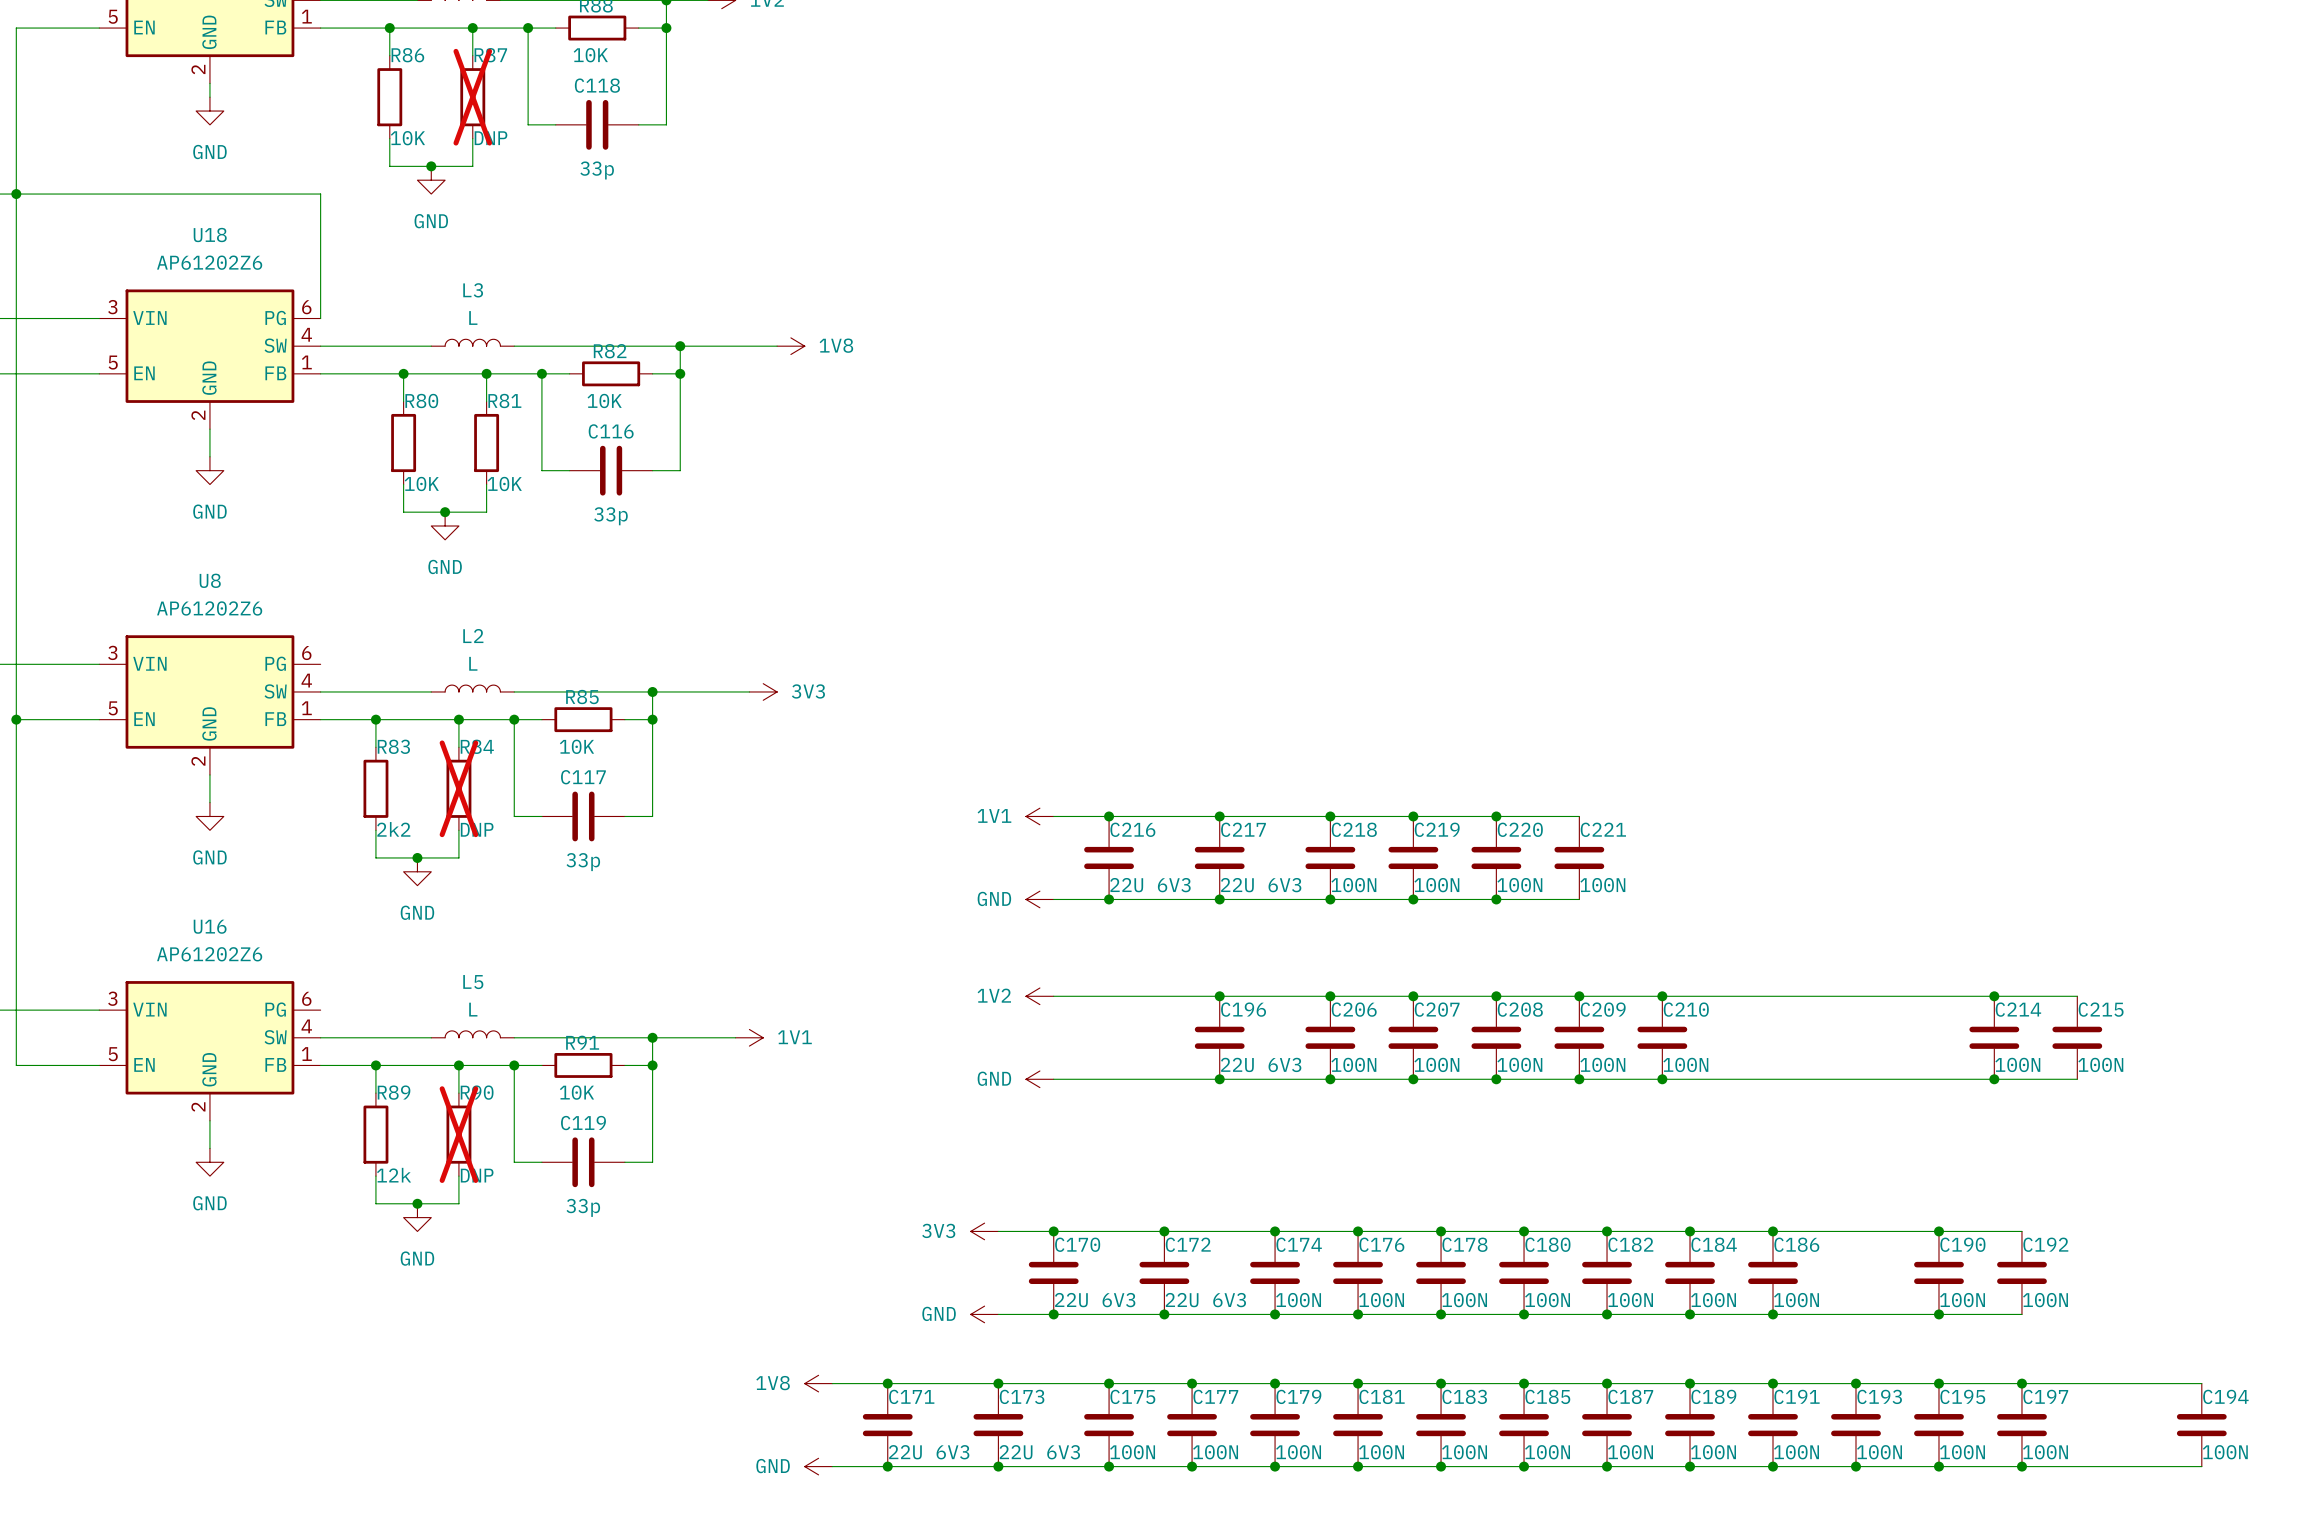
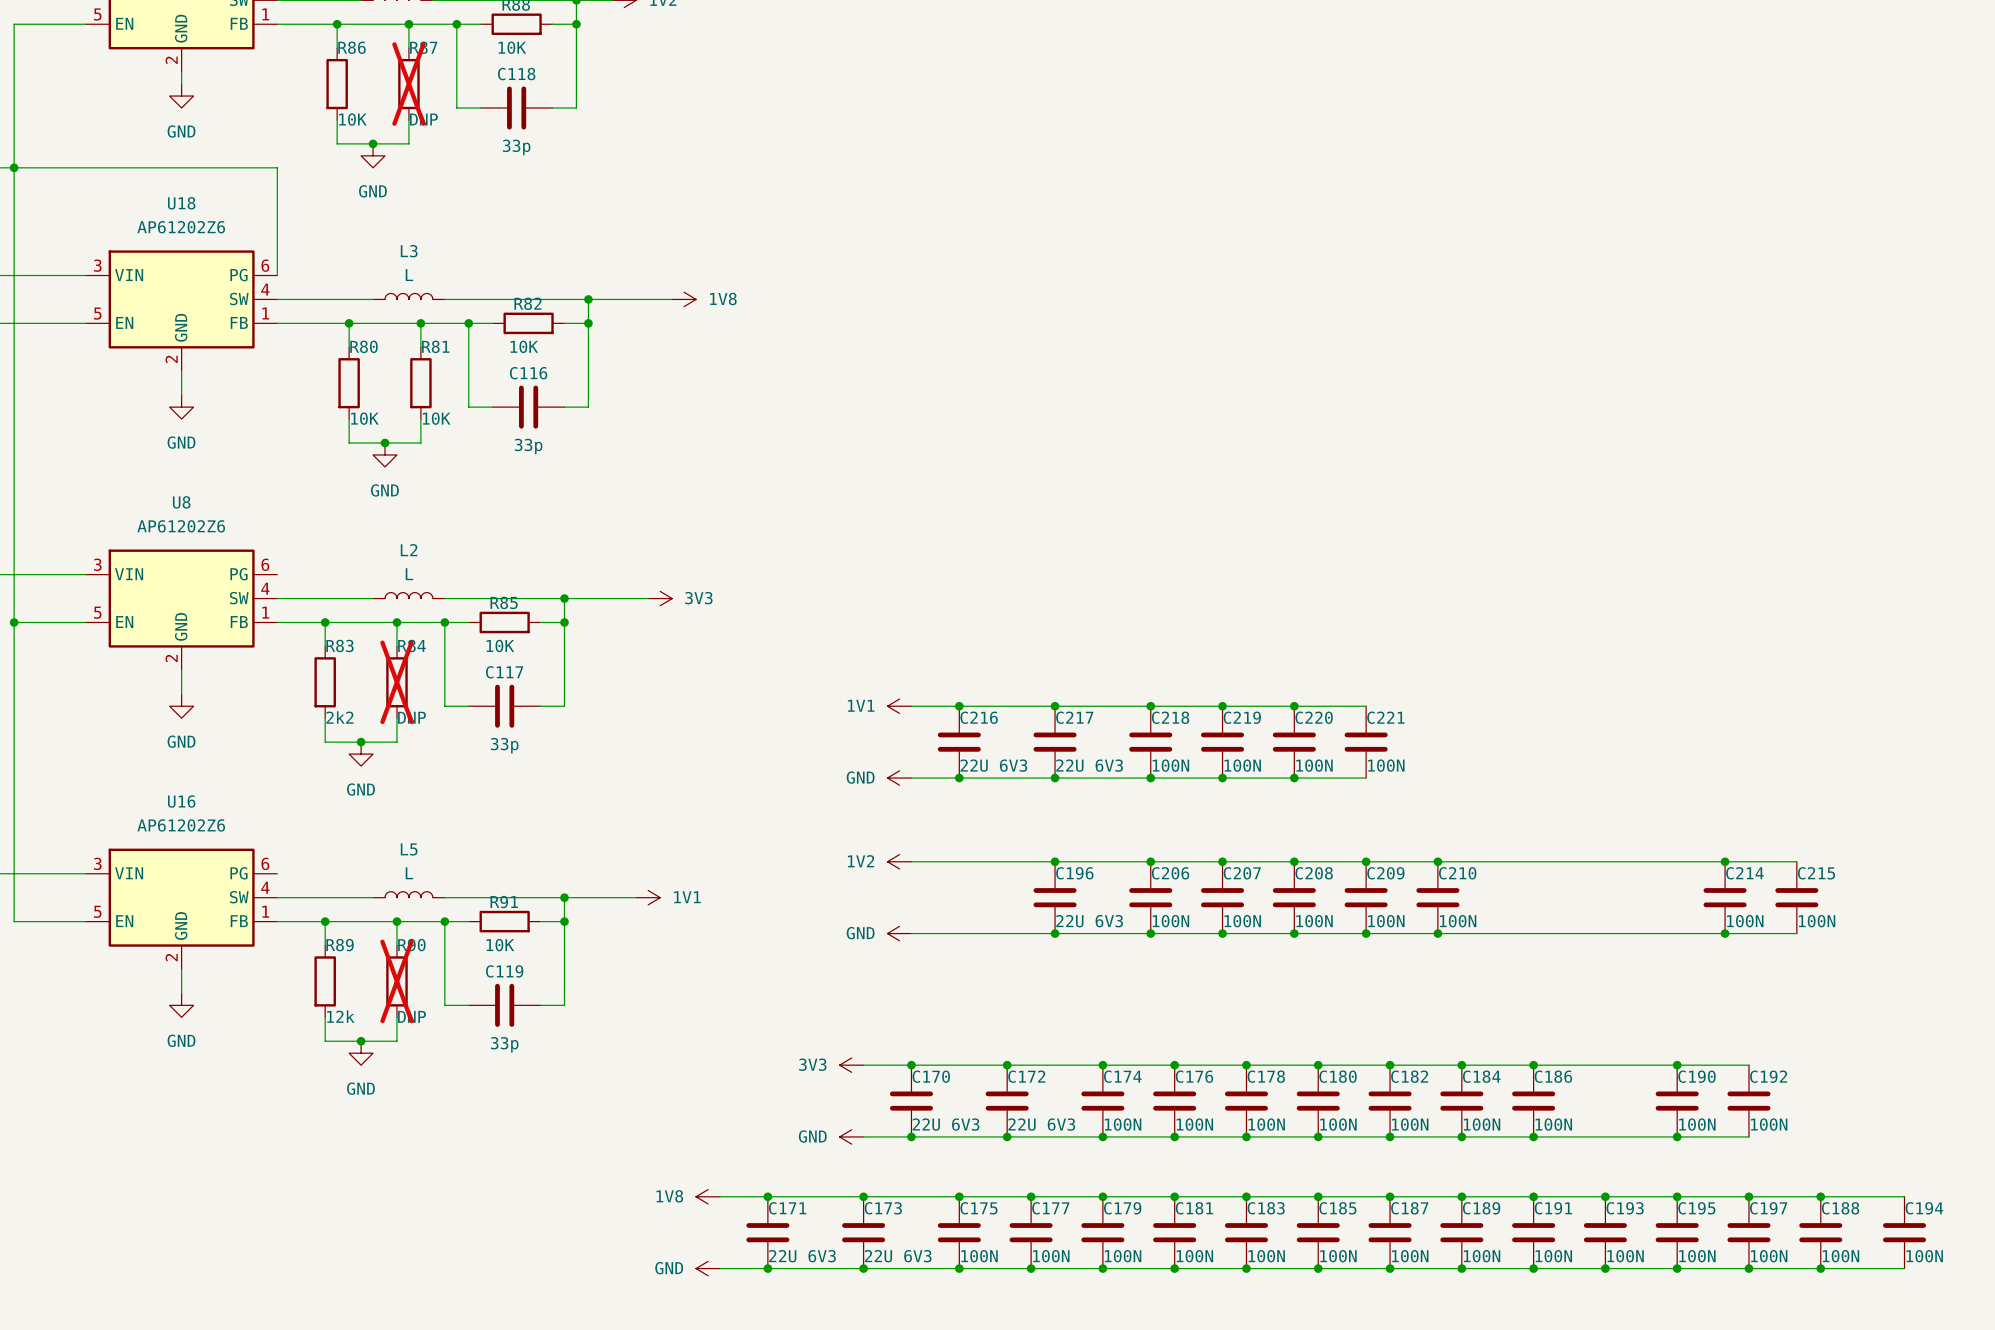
junction: none -> (1820, 1196)
C188: none -> 100N (1820, 1232)
junction: none -> (1820, 1268)

